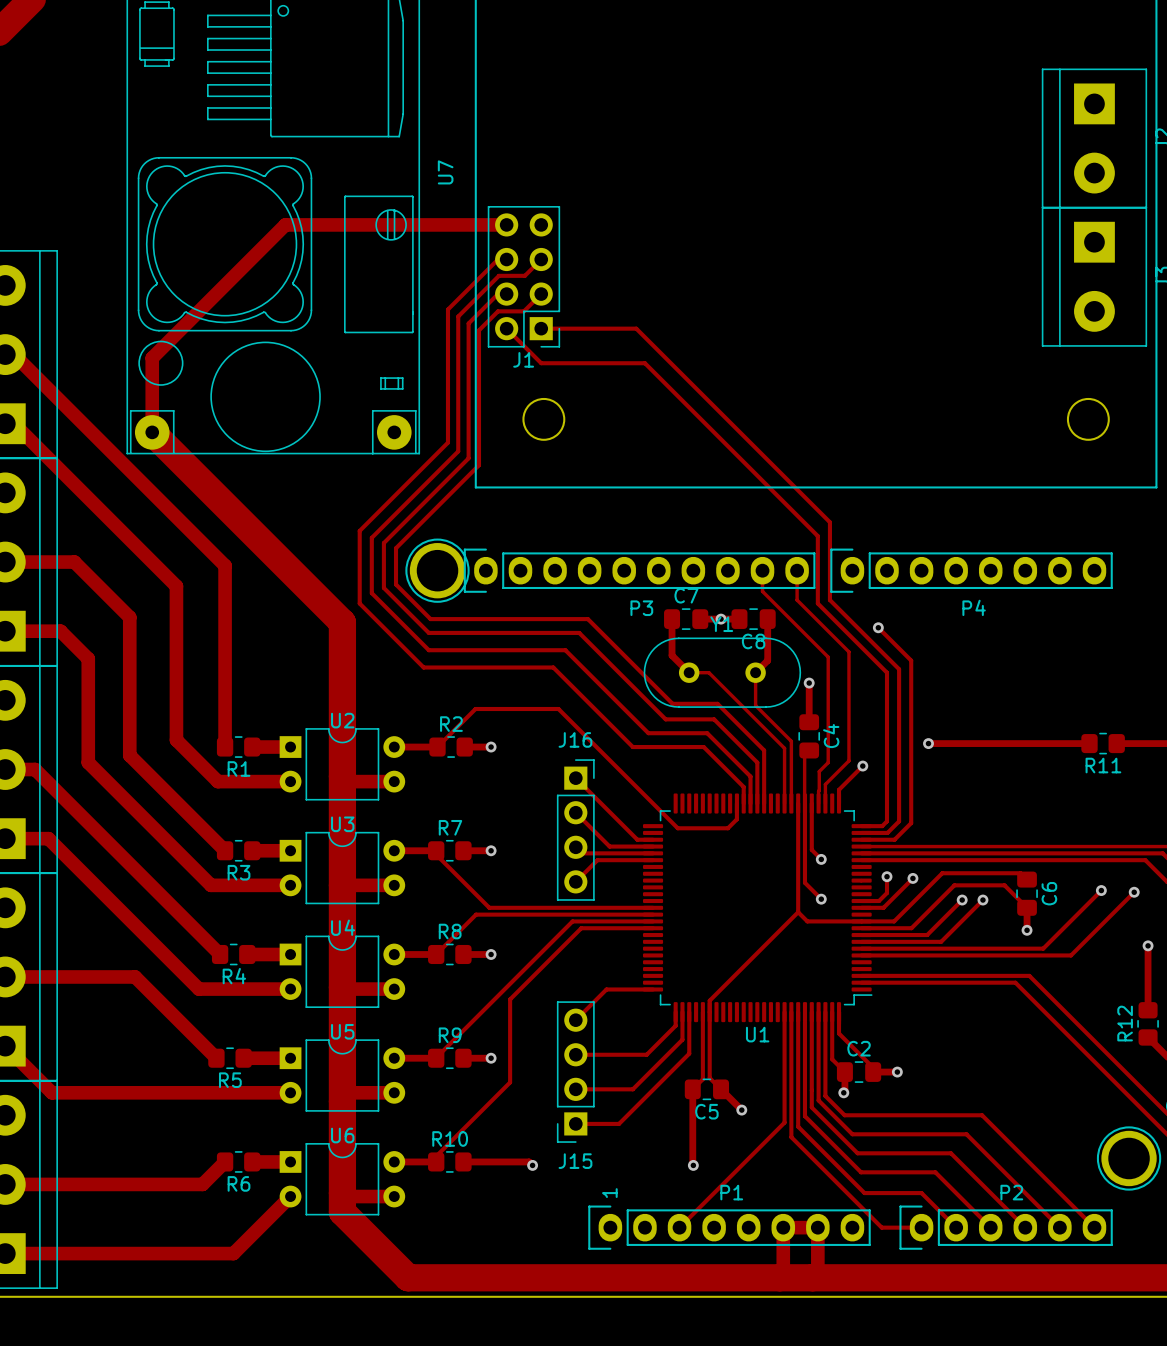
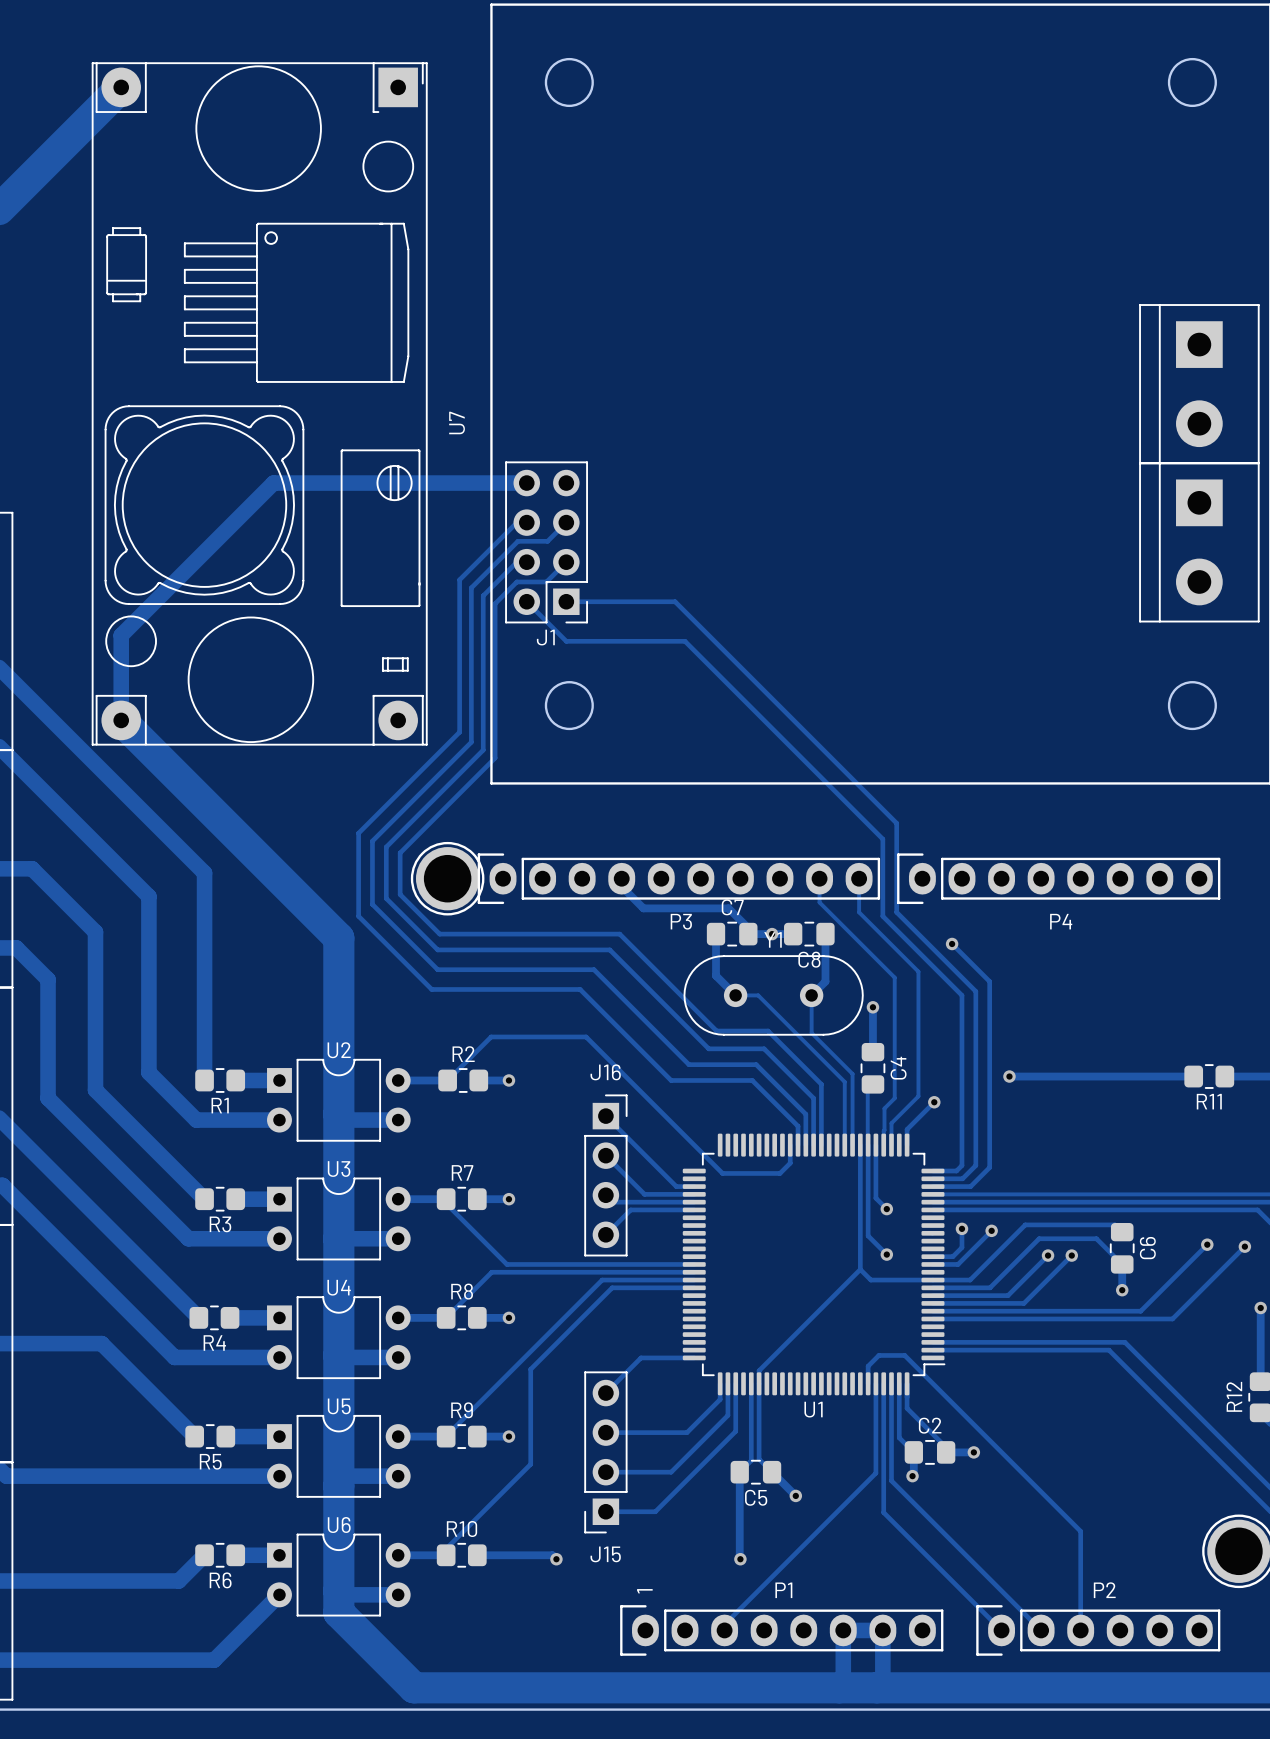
track: none -> (621, 878) (621, 886) (643, 908) (728, 908) (748, 928) (748, 934)
track: (784, 1012) (784, 1122) (679, 1227) -> none
track: (791, 1012) (791, 1137) (881, 1227) (921, 1227) -> (883, 1484) (883, 1512) (1001, 1630)
track: (798, 1012) (798, 1126) (864, 1193) (921, 1193) -> (891, 1479) (1001, 1590)
track: (804, 1021) (804, 1116) (861, 1172) (935, 1172) (990, 1227) -> (868, 1383) (868, 1366) (878, 1355) (904, 1355) (1080, 1531) (1080, 1630)
track: (811, 1090) (811, 1107) (857, 1153) (950, 1153) (1025, 1227) -> (875, 1473) (724, 1624)
track: (825, 1096) (844, 1115) (982, 1115) (1094, 1227) -> none
track: (818, 1100) (852, 1134) (966, 1134) (1059, 1227) -> none

